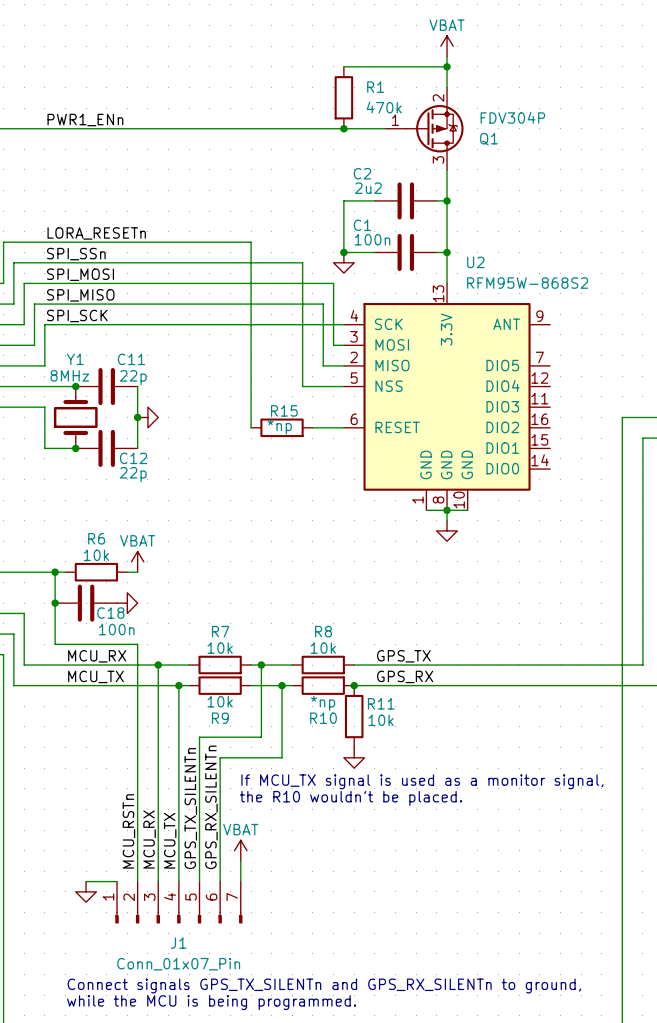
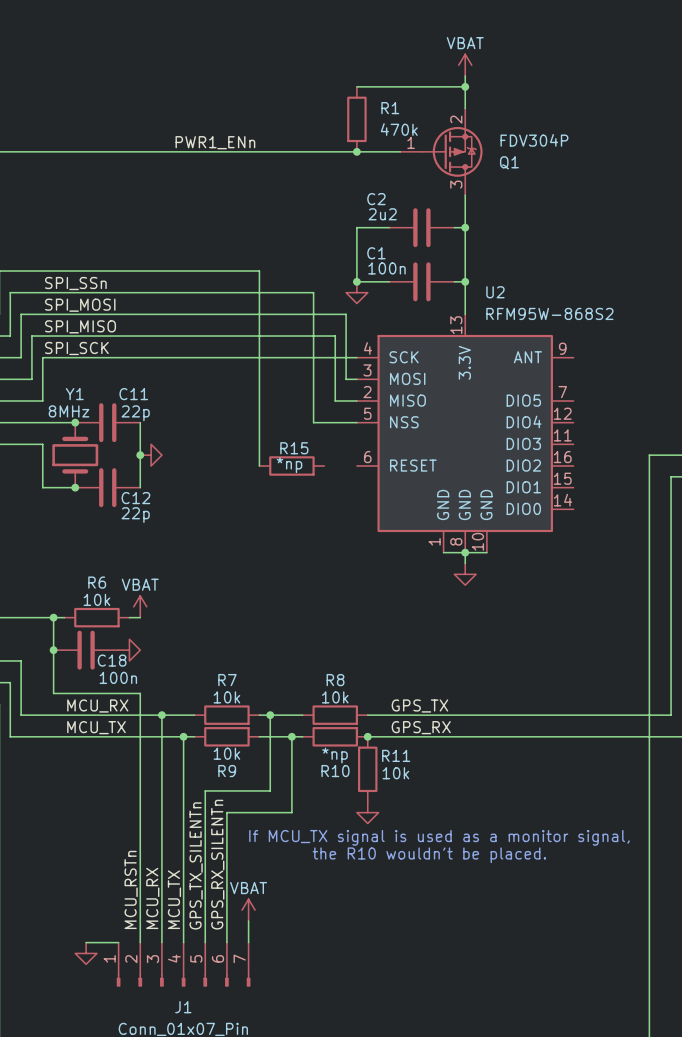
label position: PWR1_ENn (85, 120) -> PWR1_ENn (215, 142)
label: LORA_RESETn (96, 233) -> none
wire: (312, 427) (343, 427) -> none
text position: the R10 wouldn't be placed. (350, 798) -> the R10 wouldn't be placed. (429, 855)

